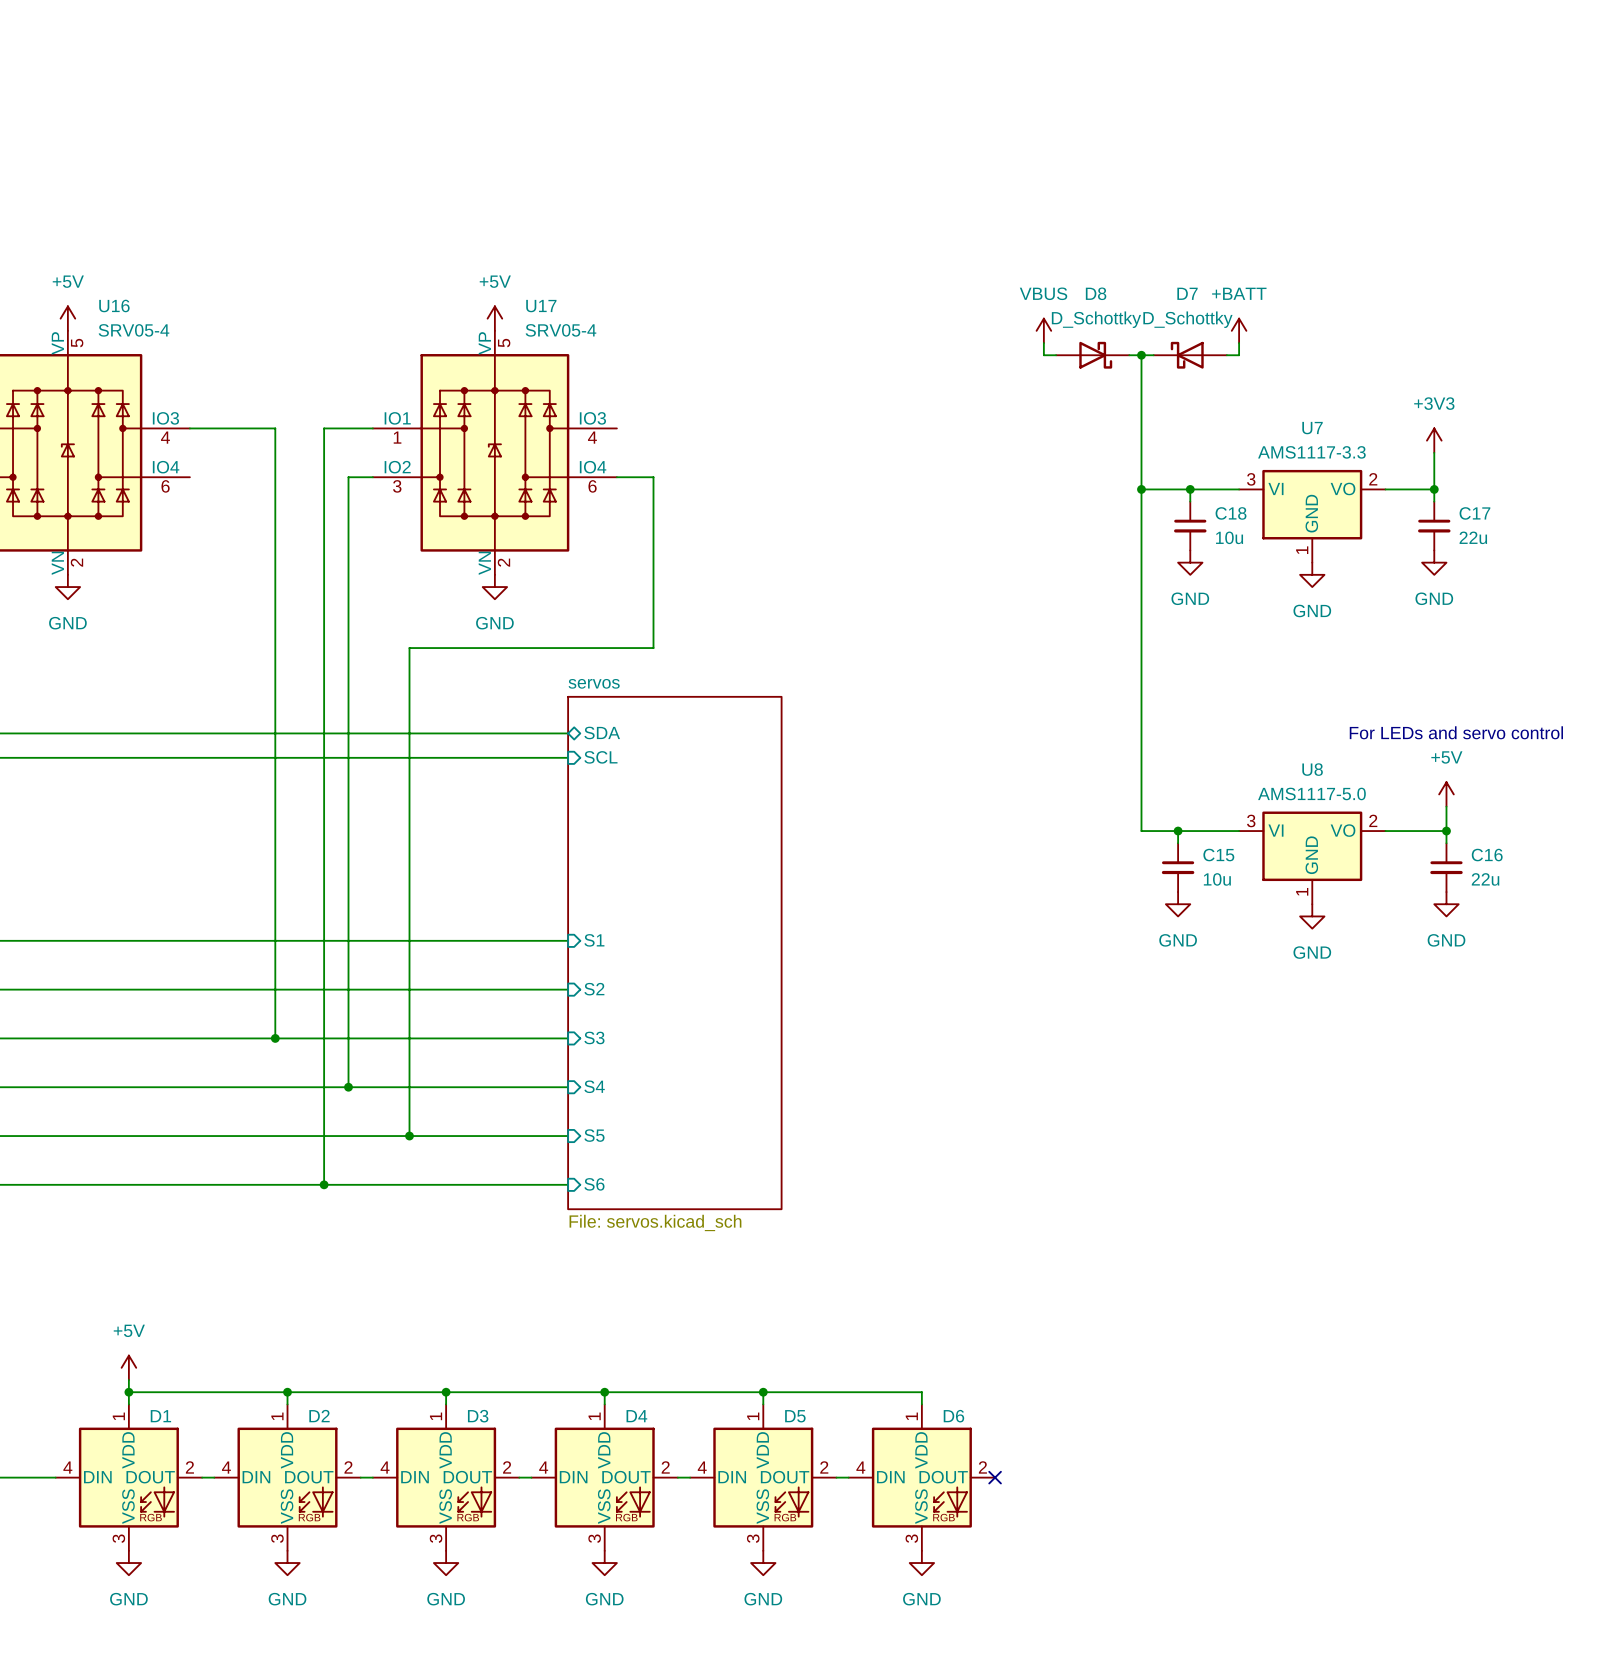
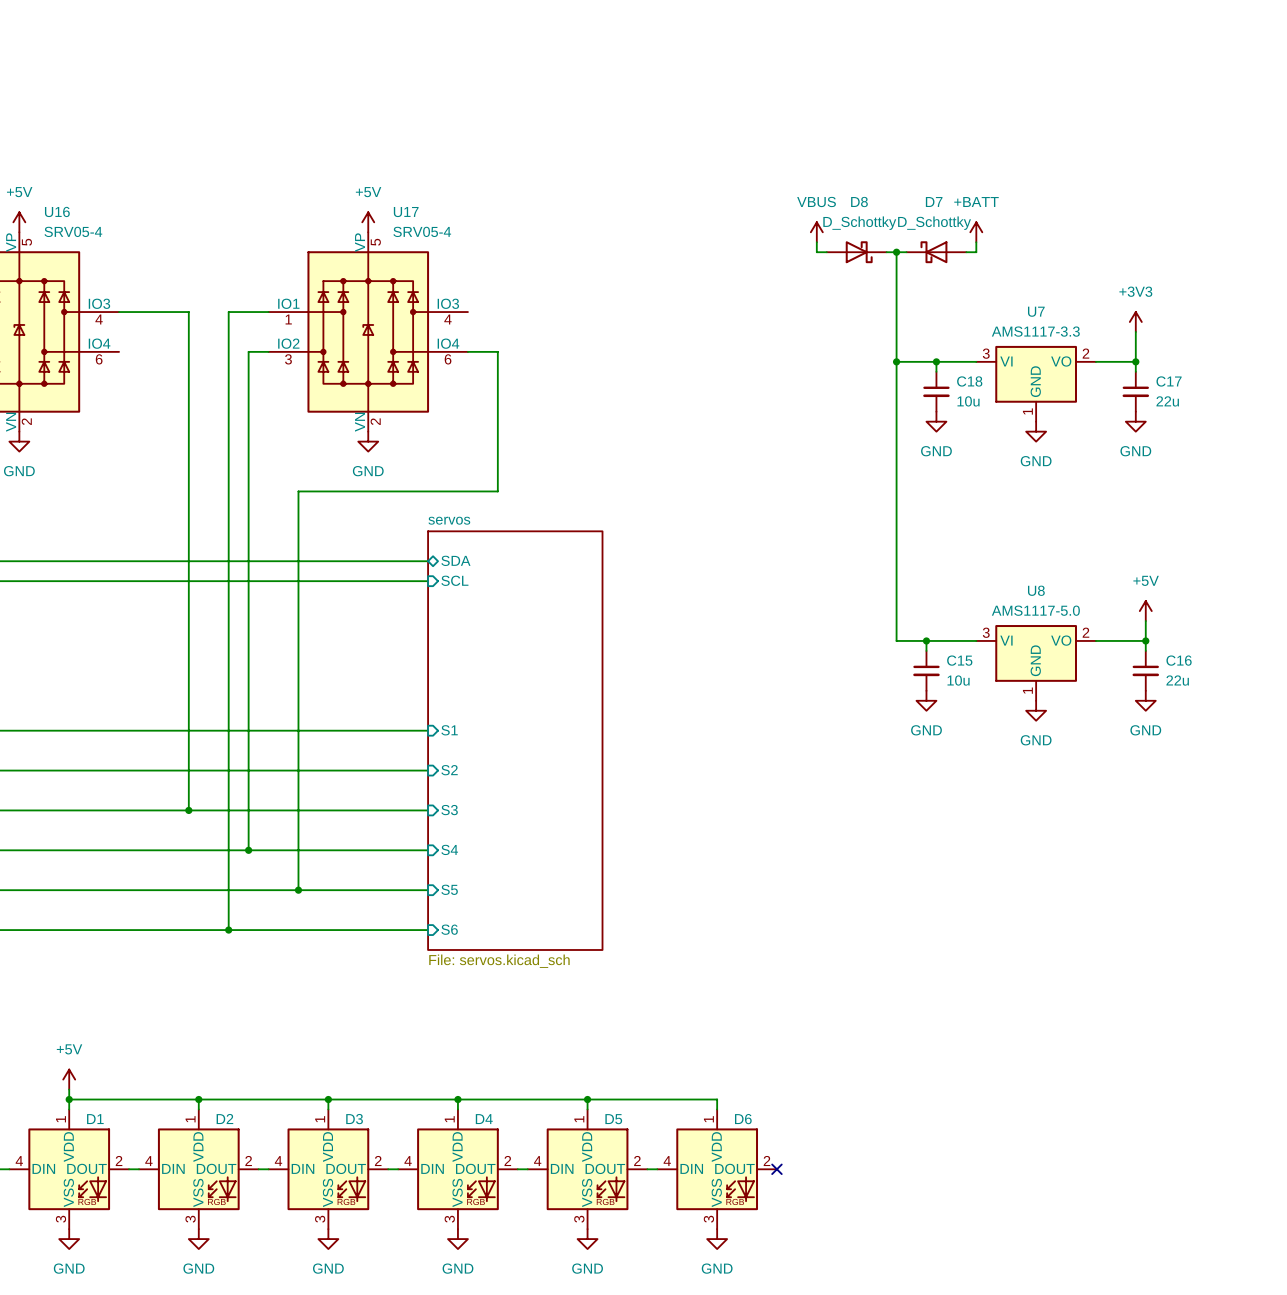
text: For LEDs and servo control (1456, 732) -> none

